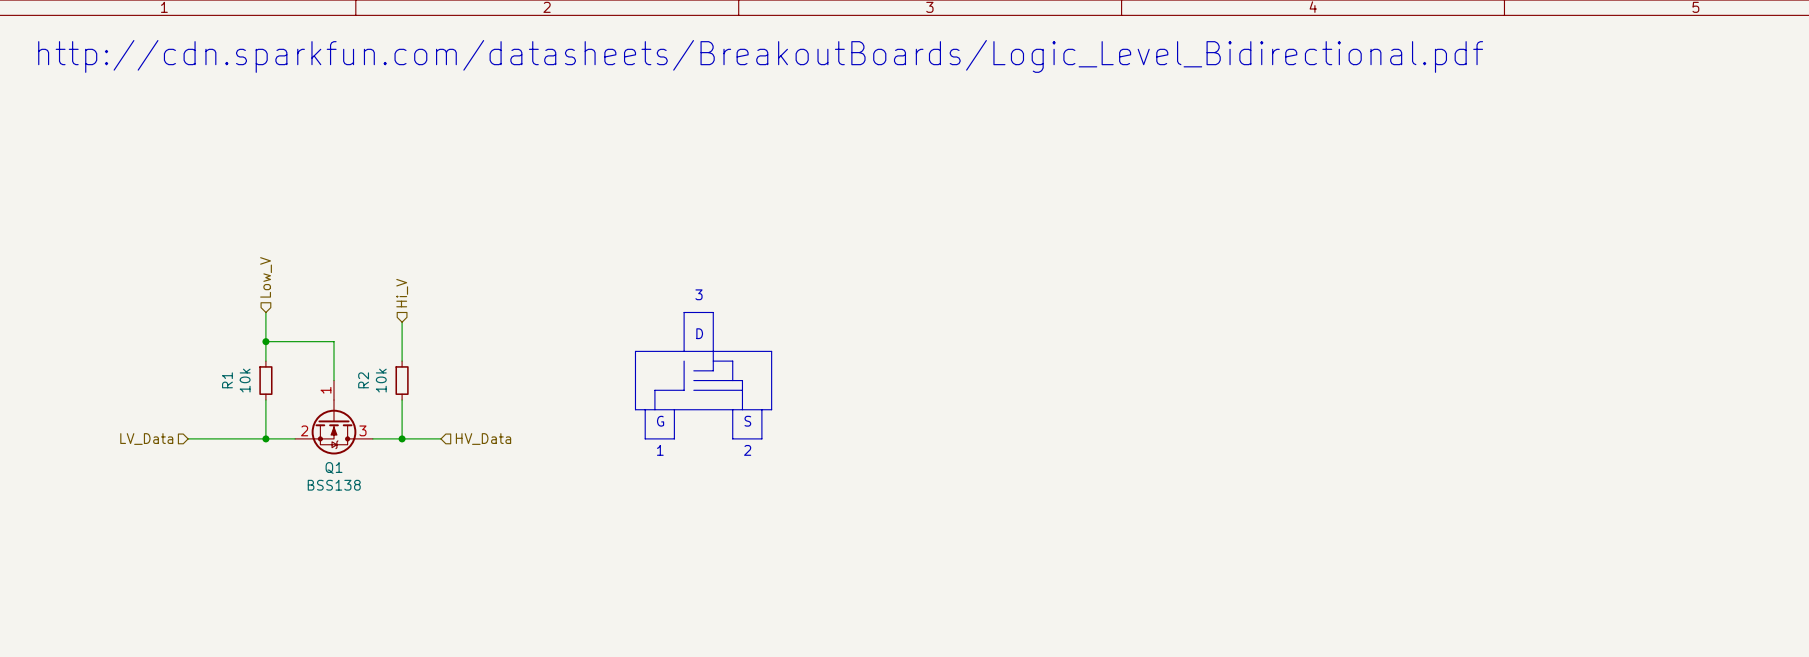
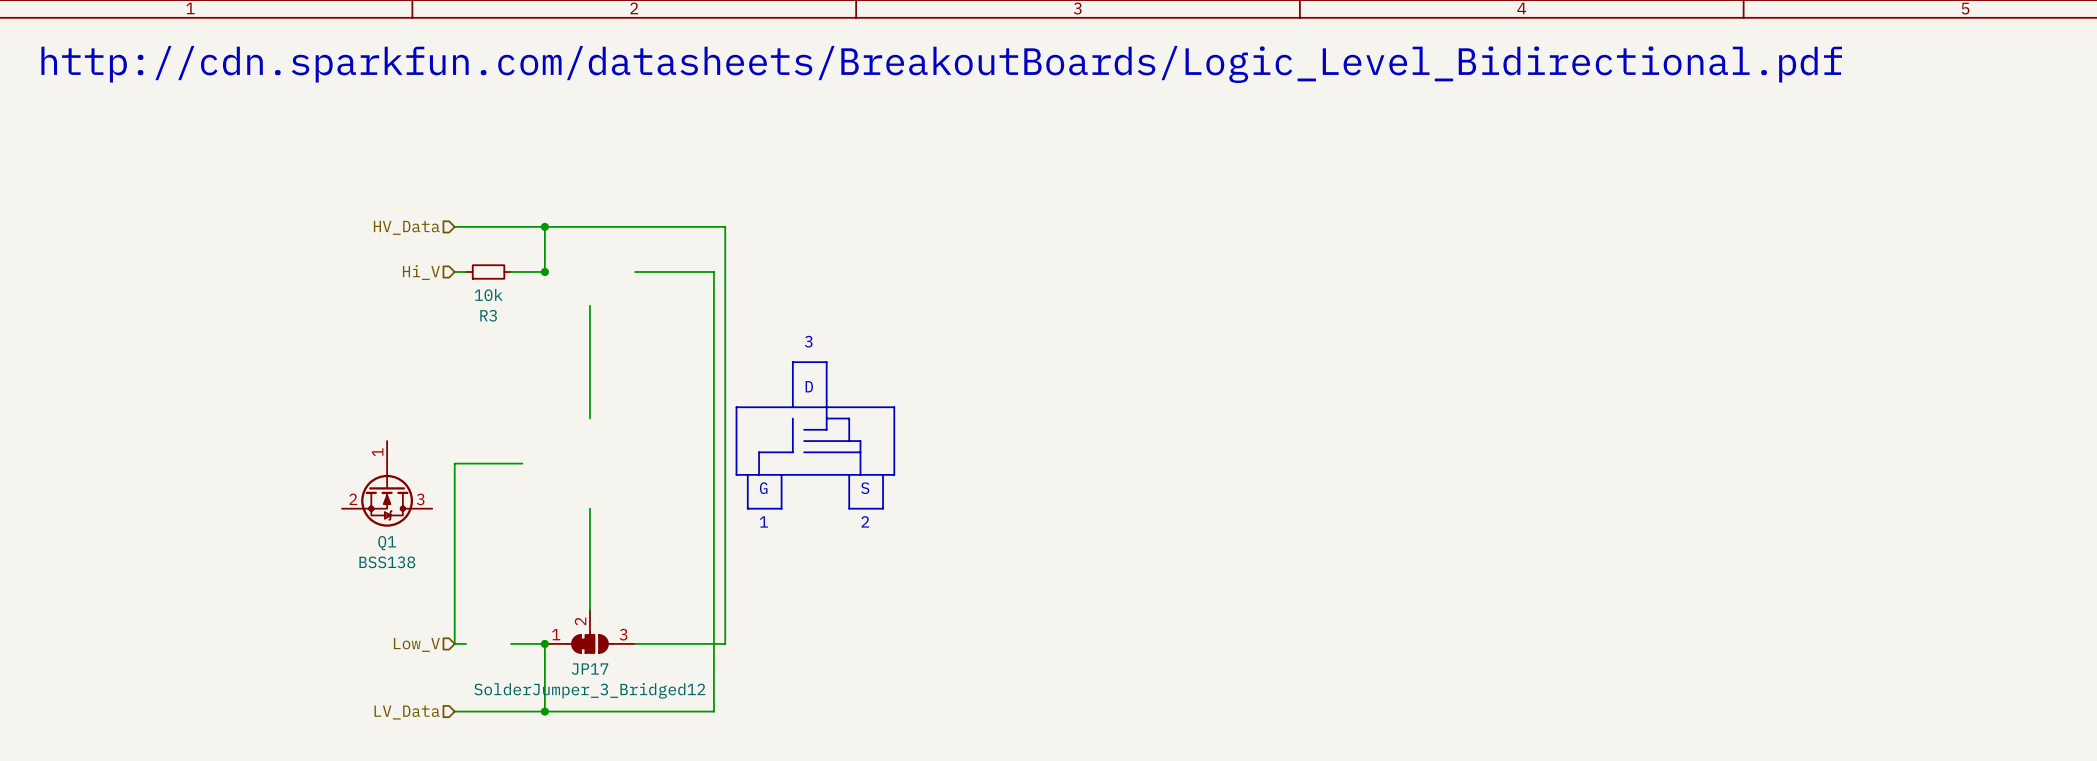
hierarchical label: none -> HV_Data (406, 227)
wire: none -> (454, 226) (725, 226) (725, 643) (635, 643)
wire: none -> (544, 226) (544, 271) (511, 271)
junction: none -> (544, 226)
wire: none -> (454, 271) (465, 271)
R3: none -> 10k (488, 271)
junction: none -> (544, 271)
wire: none -> (635, 271) (713, 271) (713, 711) (454, 711)
wire: none -> (589, 305) (589, 418)
hierarchical label: Low_V (266, 277) -> none
hierarchical label rotation: 0° (402, 293) -> 90° counterclockwise (421, 272)
hierarchical label position: Hi_V (402, 293) -> Hi_V (421, 272)
wire: (265, 312) (265, 361) -> none
wire: (402, 322) (402, 361) -> none
wire: (265, 341) (334, 341) (334, 380) -> none
junction: (265, 341) -> none
R1: 10k (265, 380) -> none
R2: 10k (402, 380) -> none
wire: (265, 400) (265, 438) -> none
wire: (402, 400) (402, 438) -> none
wire: none -> (522, 463) (454, 463) (454, 643) (465, 643)
wire: (188, 438) (295, 438) -> none
junction: (265, 438) -> none
wire: (372, 438) (440, 438) -> none
junction: (402, 438) -> none
wire: none -> (589, 508) (589, 610)
hierarchical label: LV_Data (146, 439) -> none
hierarchical label: HV_Data (483, 439) -> none
JP17: none -> SolderJumper_3_Bridged12 (589, 631)
hierarchical label: none -> Low_V (416, 644)
wire: none -> (511, 643) (544, 643) (544, 711)
junction: none -> (544, 643)
junction: none -> (544, 711)
hierarchical label: none -> LV_Data (407, 712)

